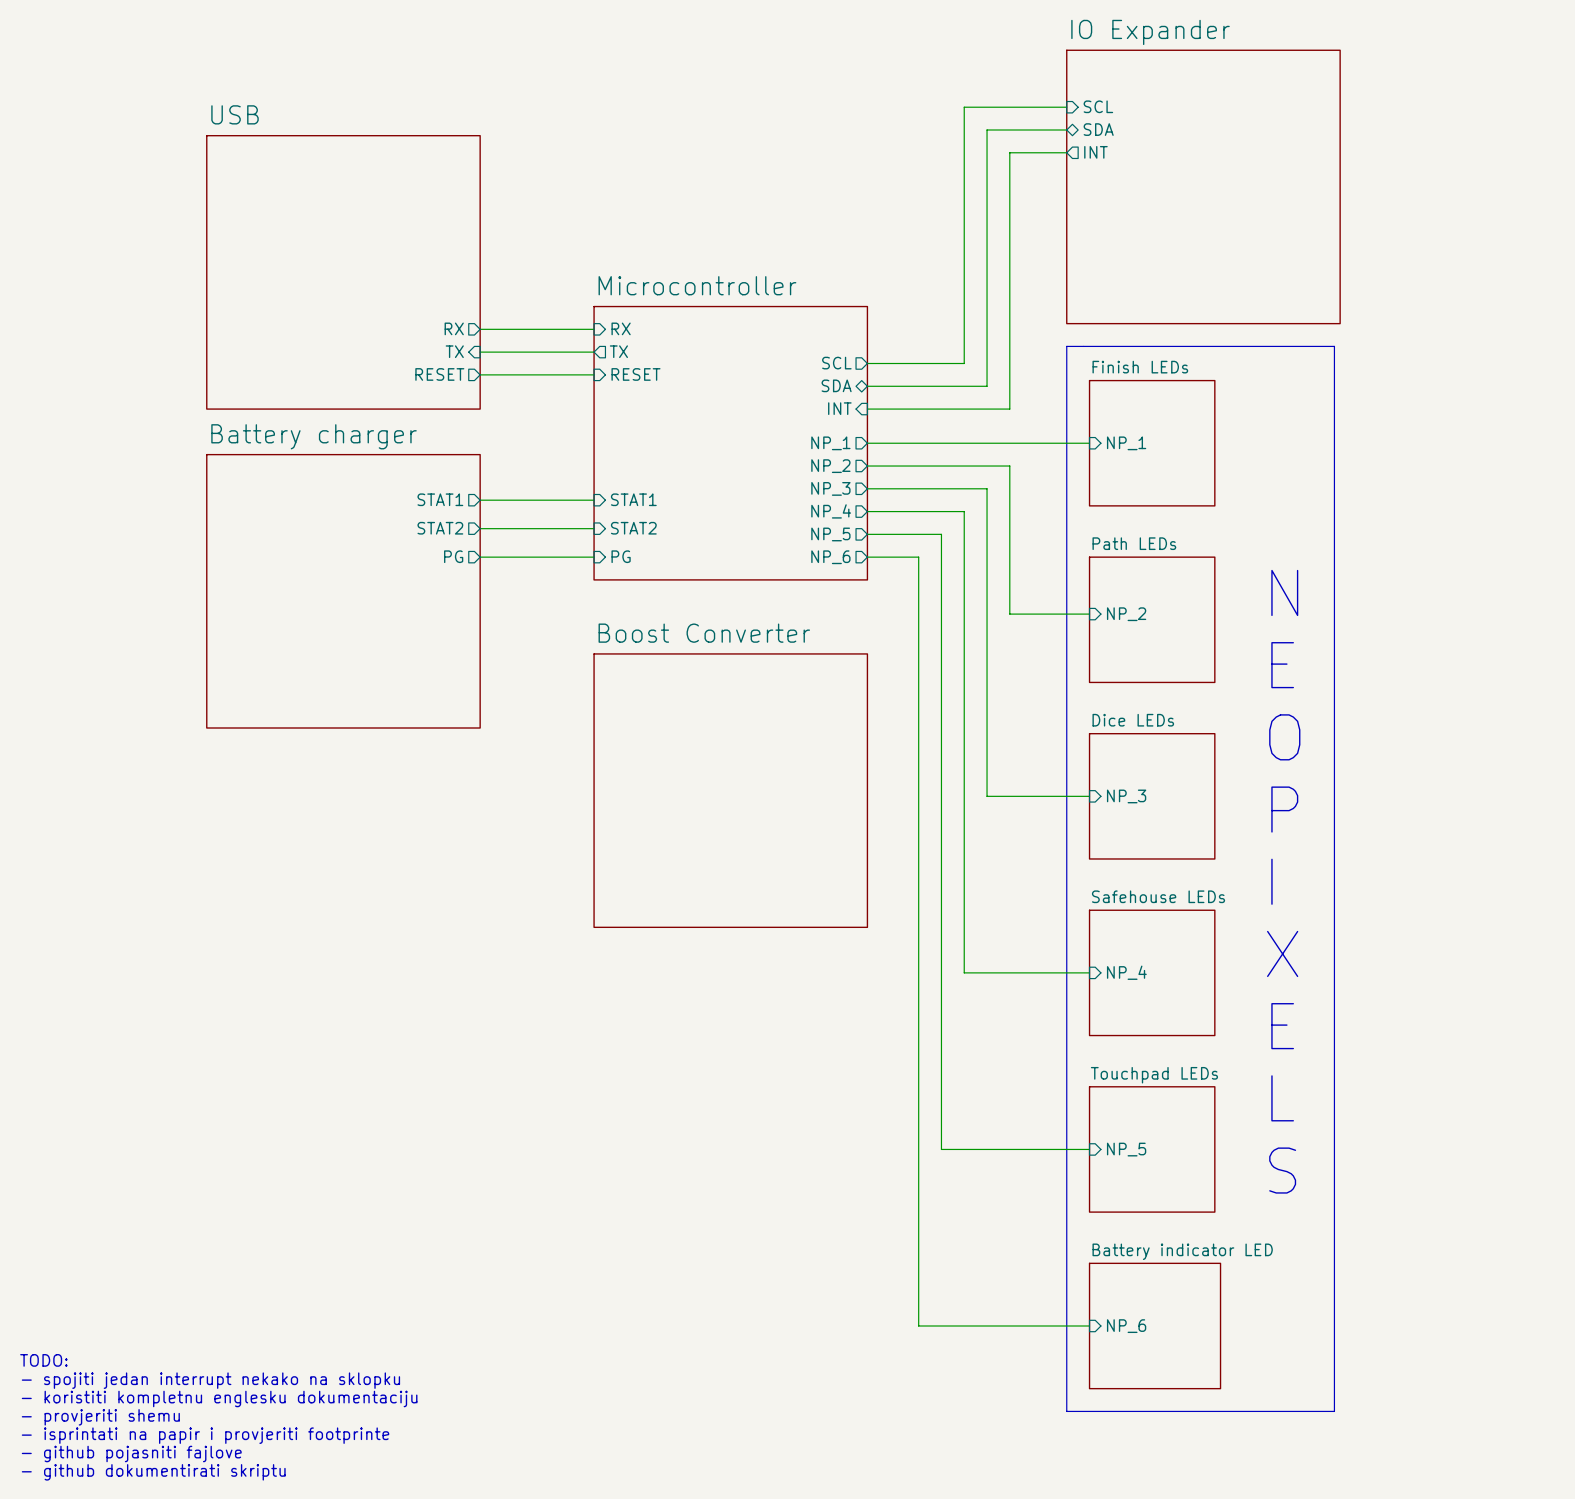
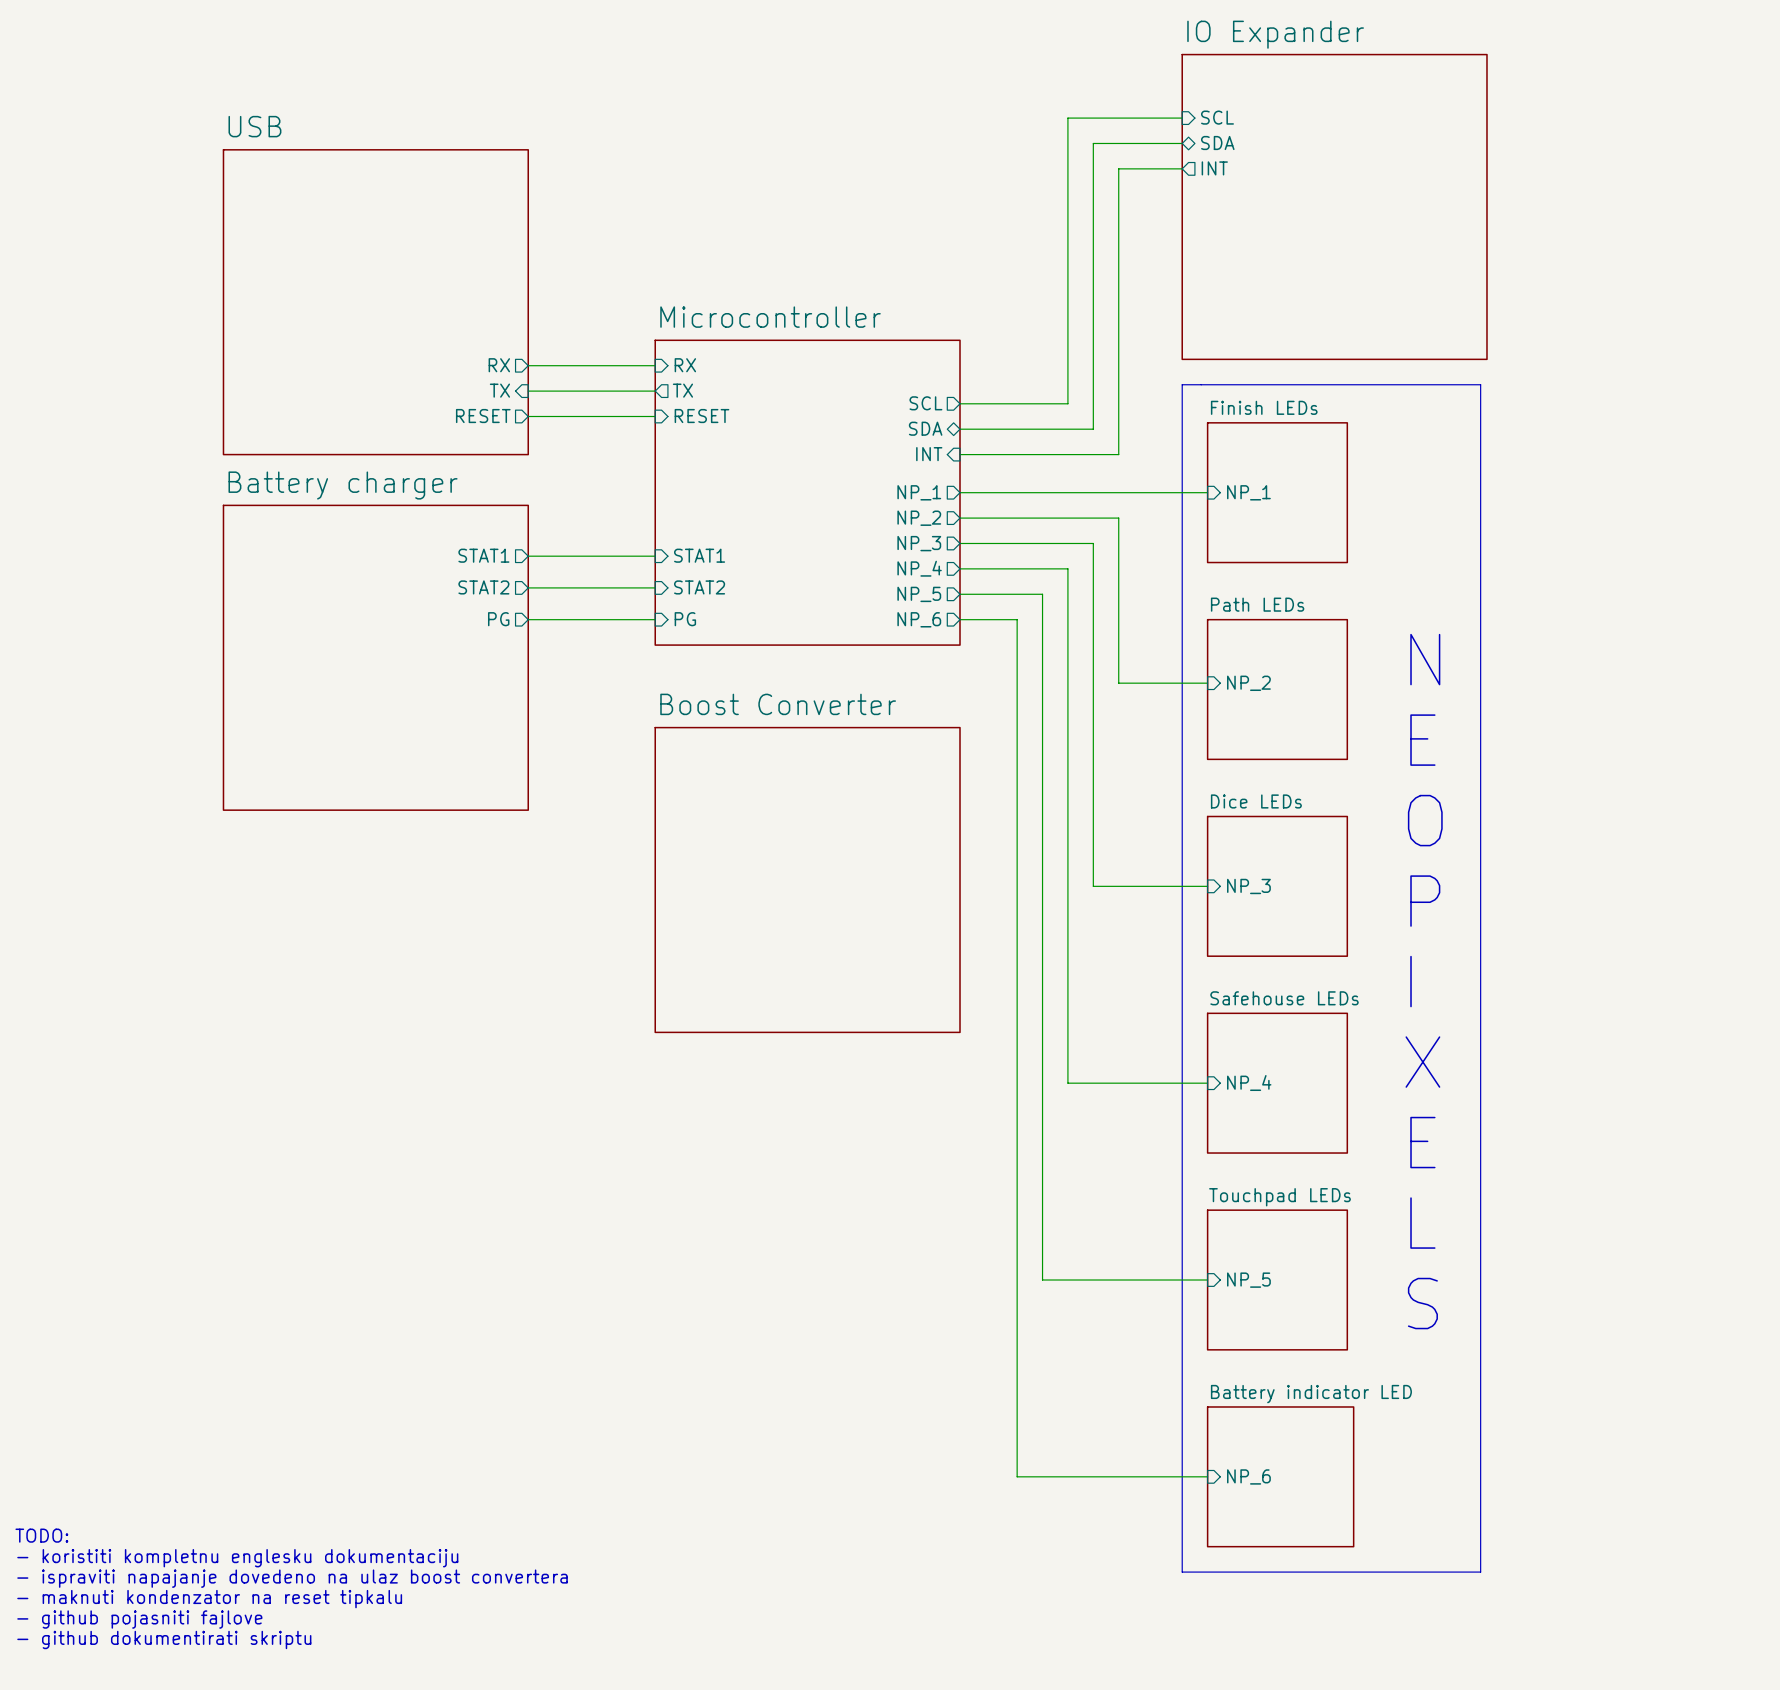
text: TODO: (43, 1360) -> none
text: - spojiti jedan interrupt nekako na sklopku (210, 1380) -> TODO: (41, 1535)
text: - provjeriti shemu (100, 1417) -> - ispraviti napajanje dovedeno na ulaz boost convertera (292, 1578)
text: - isprintati na papir i provjeriti footprinte (205, 1435) -> - maknuti kondenzator na reset tipkalu (209, 1599)

